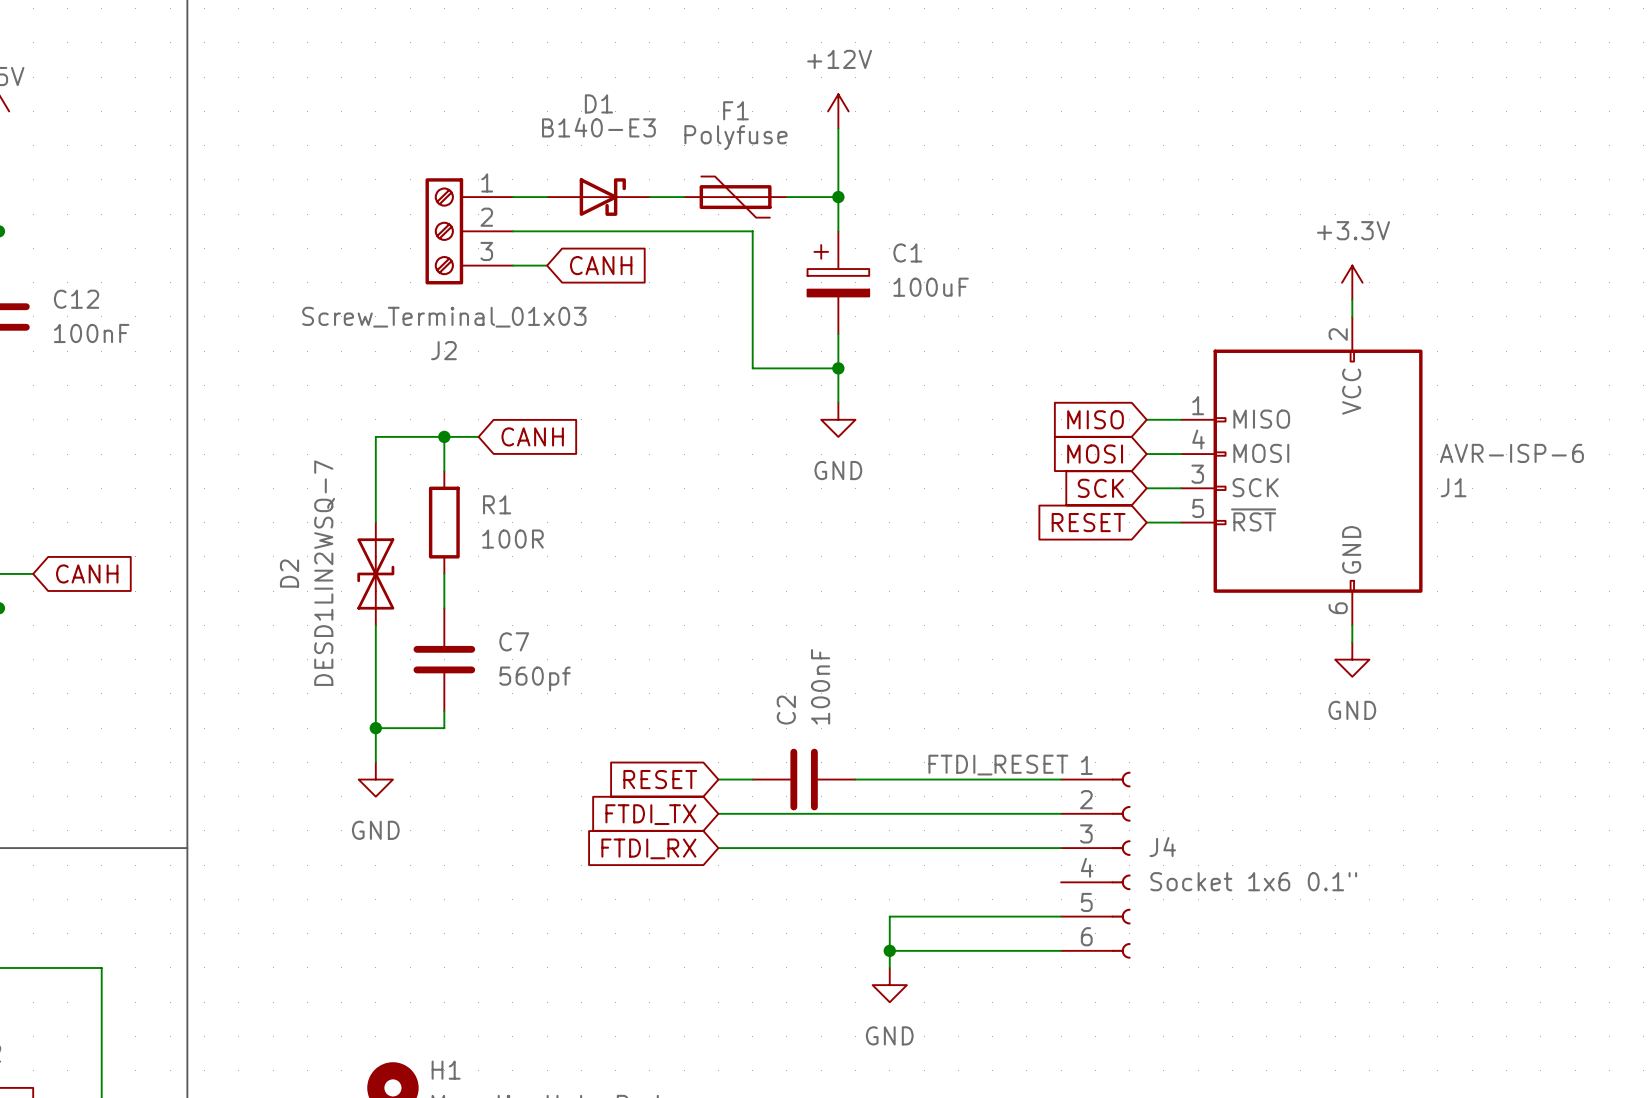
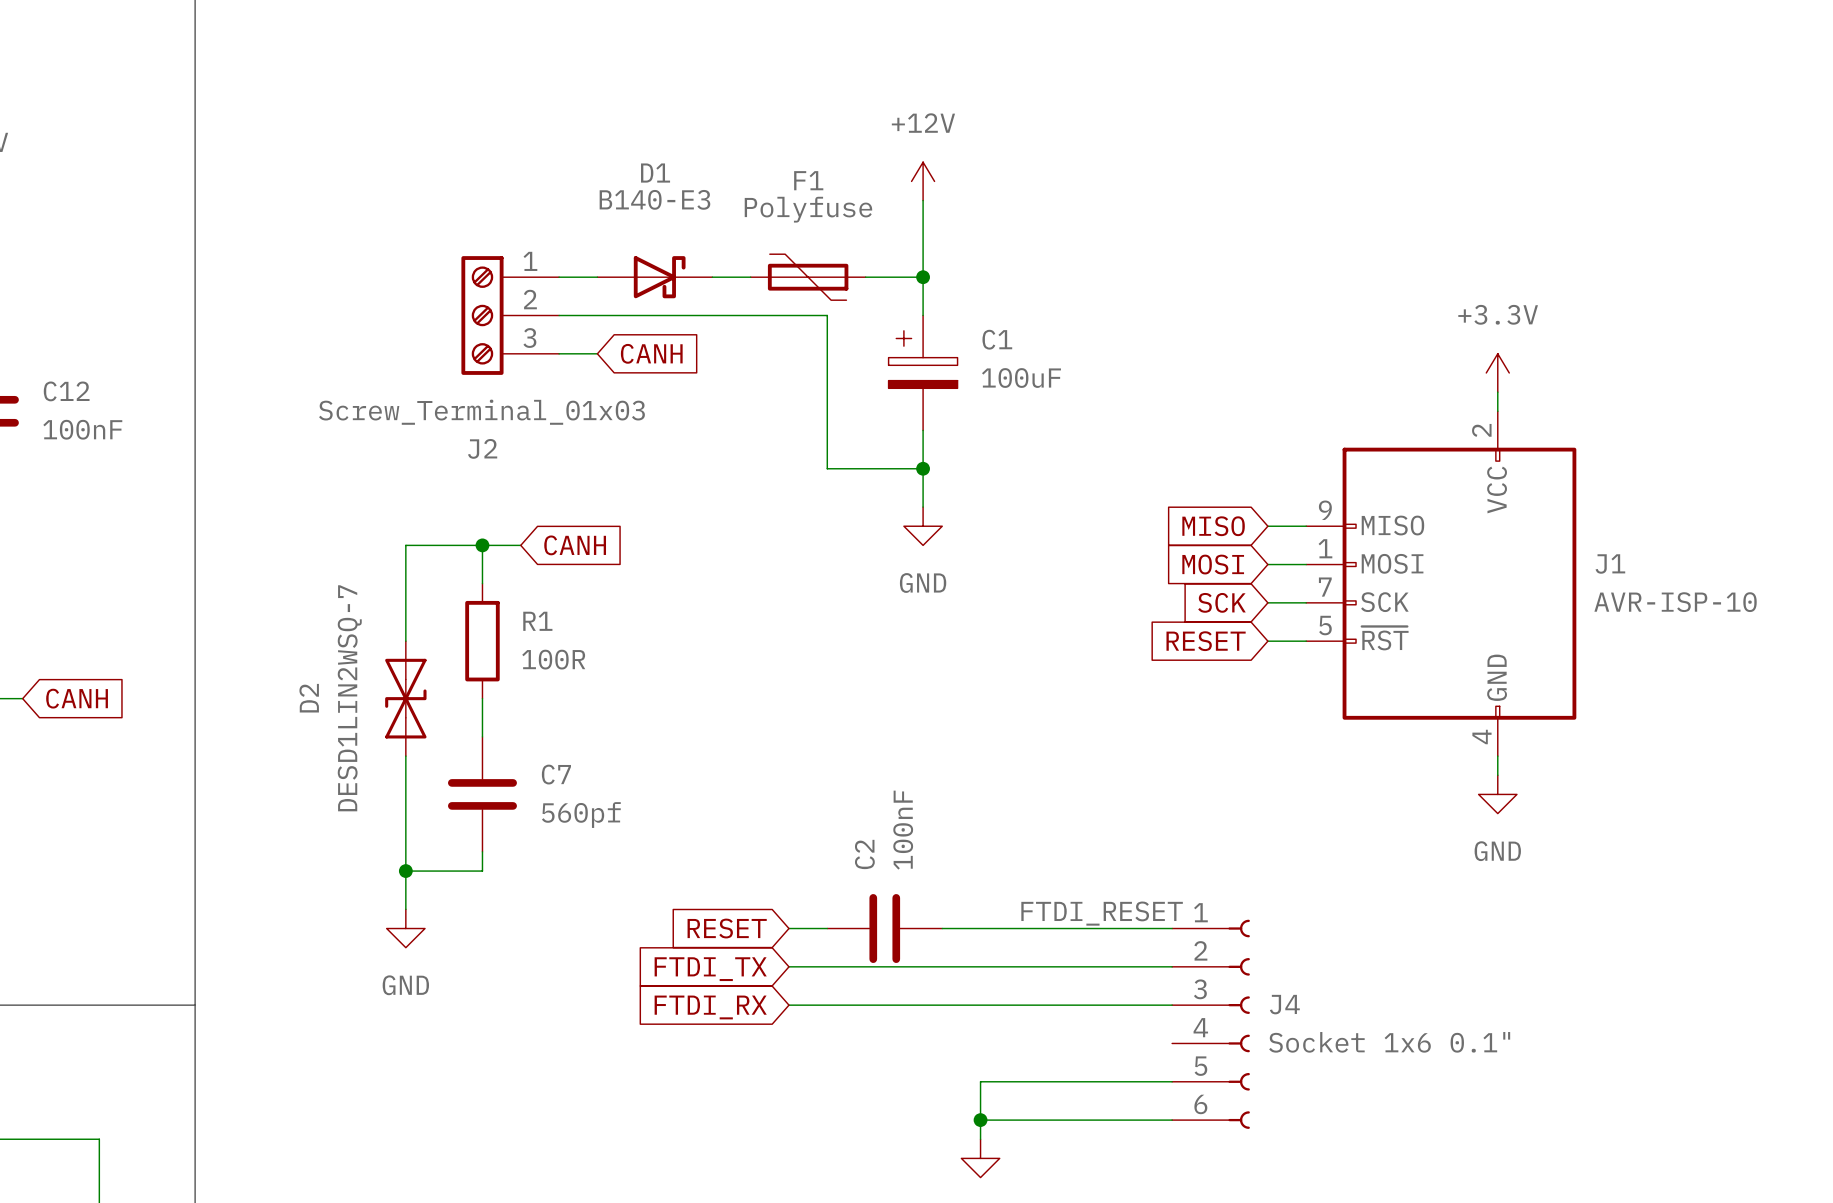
J1 pin number: 1 (1198, 405) -> 9 (1325, 510)
J1 pin number: 4 (1198, 439) -> 1 (1325, 548)
J1 value: AVR-ISP-6 (1511, 453) -> AVR-ISP-10 (1675, 602)
J1 pin number: 3 (1197, 474) -> 7 (1325, 587)
J1 name position: J1 (1453, 487) -> J1 (1610, 563)
J1 pin number: 6 (1338, 608) -> 4 (1481, 737)

